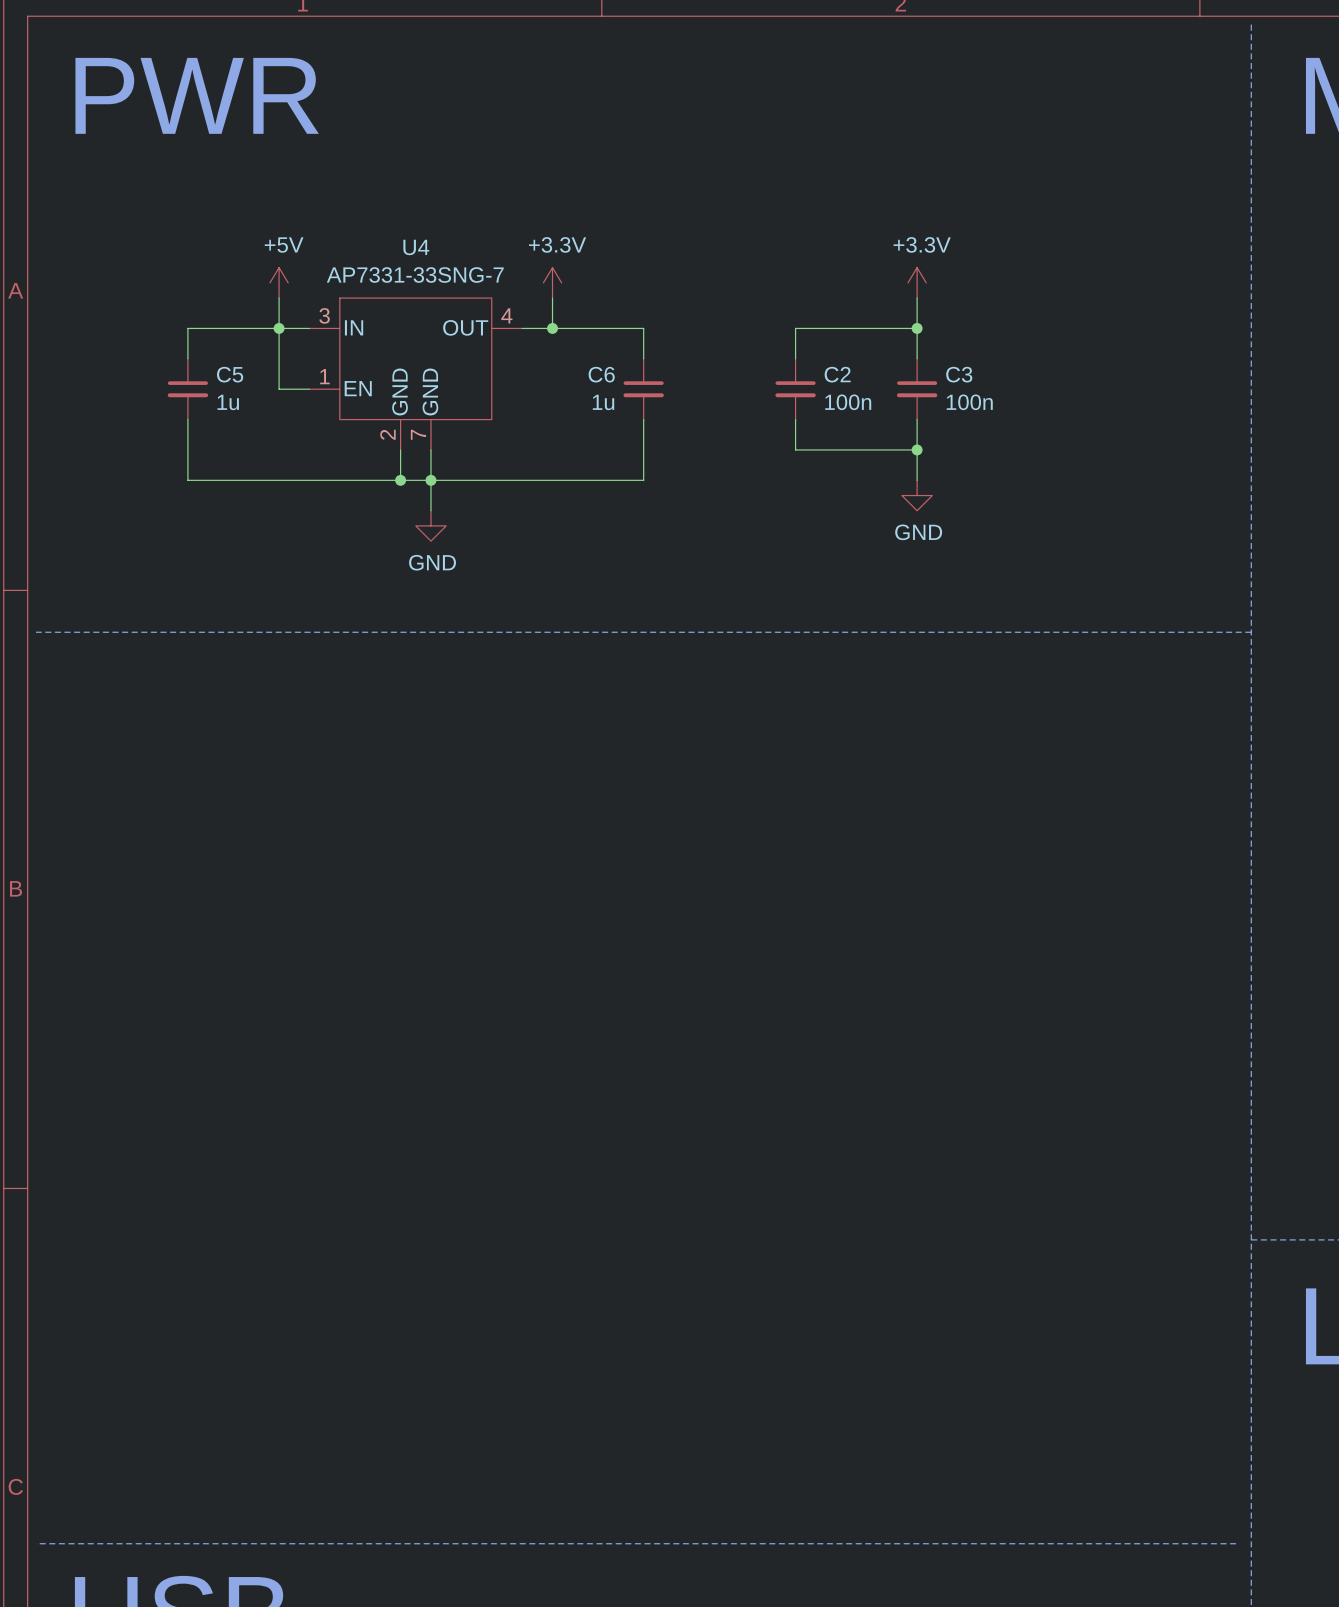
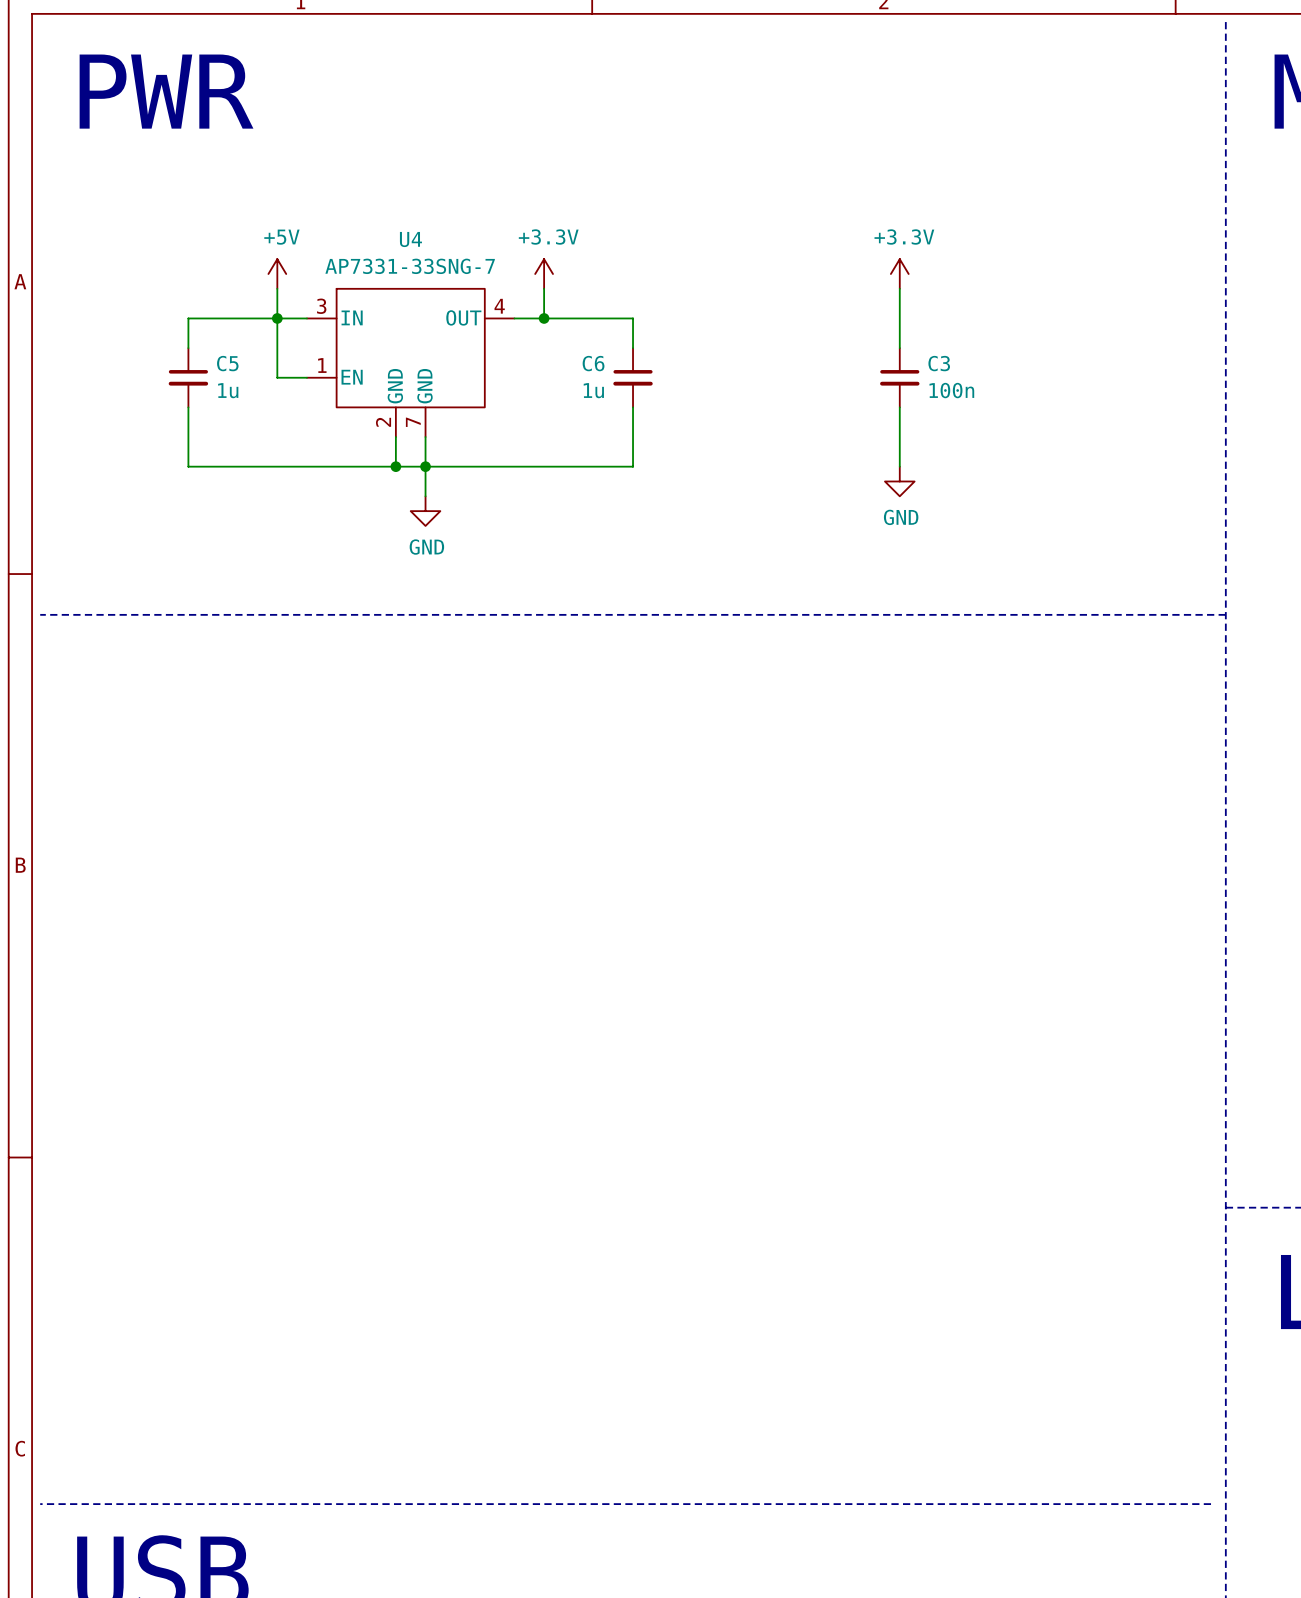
wire: (917, 328) (795, 328) (795, 358) -> none
junction: (917, 328) -> none
C2: 100n (795, 389) -> none
wire: (795, 419) (795, 449) (917, 449) -> none
junction: (917, 449) -> none

